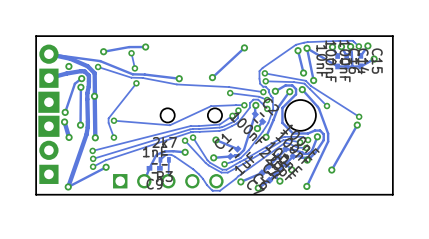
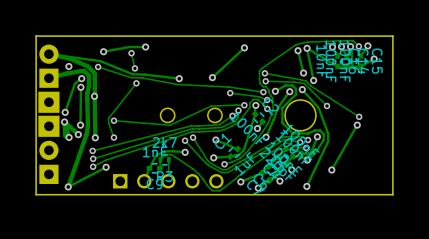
track: none -> (78, 134) (64, 122) (65, 136)
via: none -> (78, 134)

